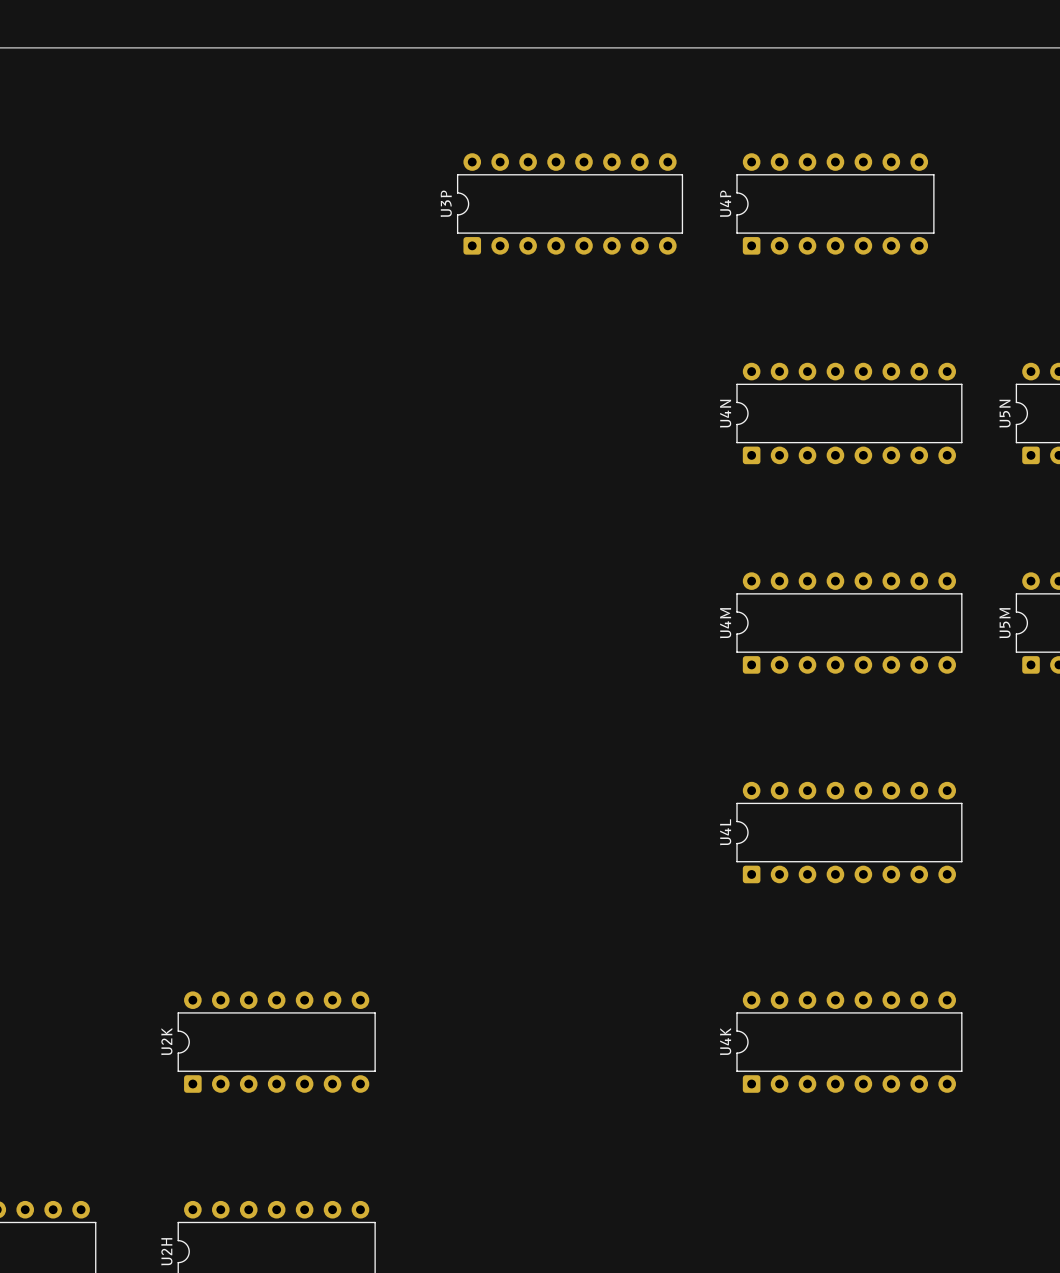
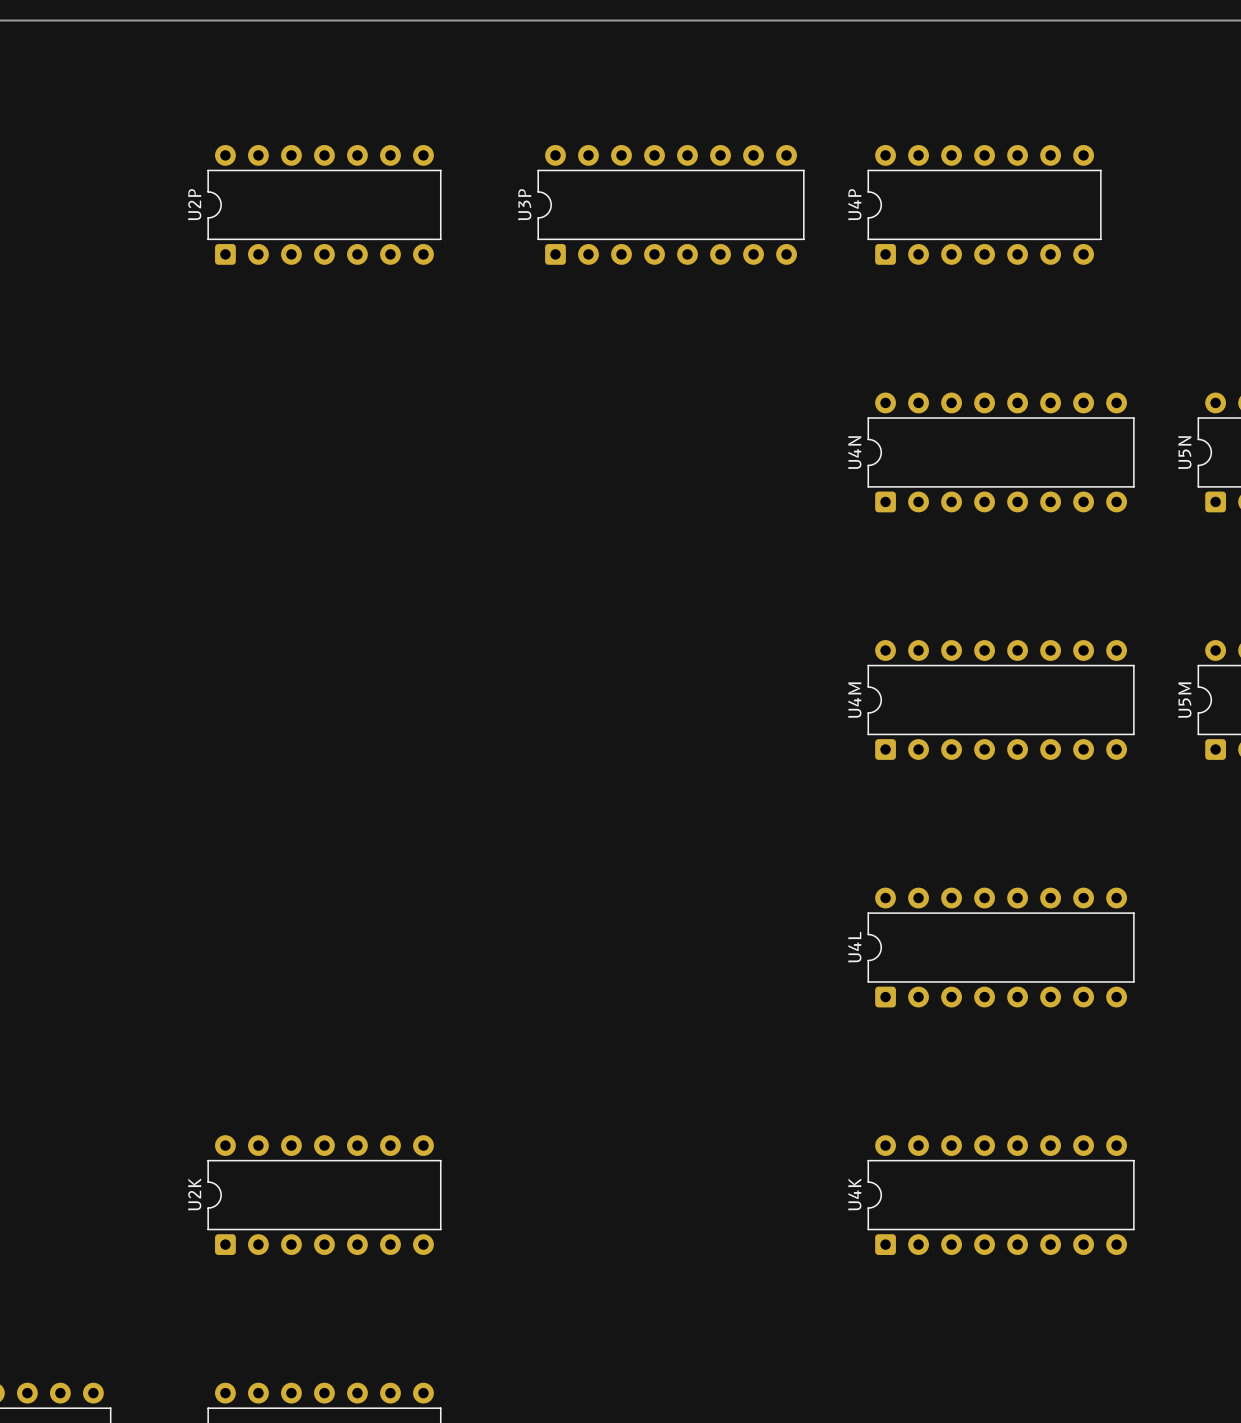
U2P: none -> (324, 204)

